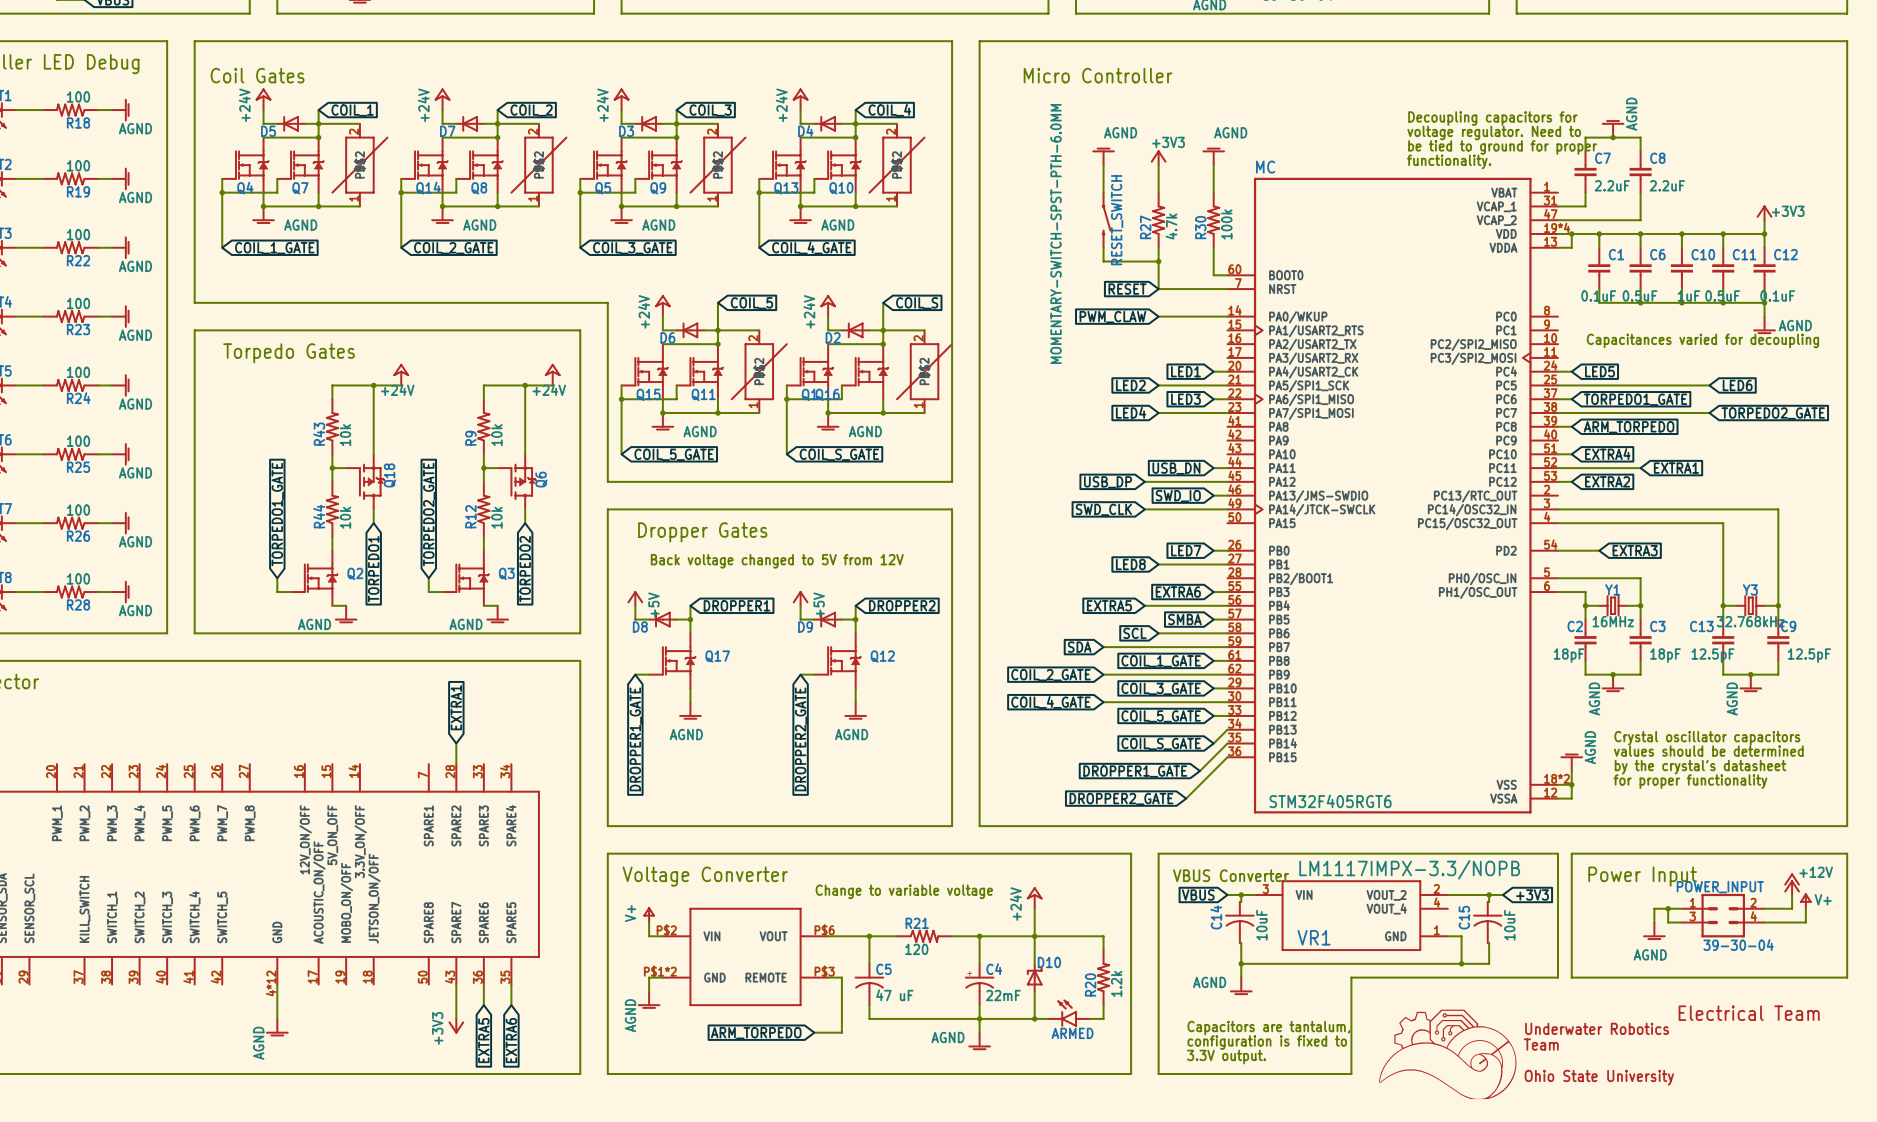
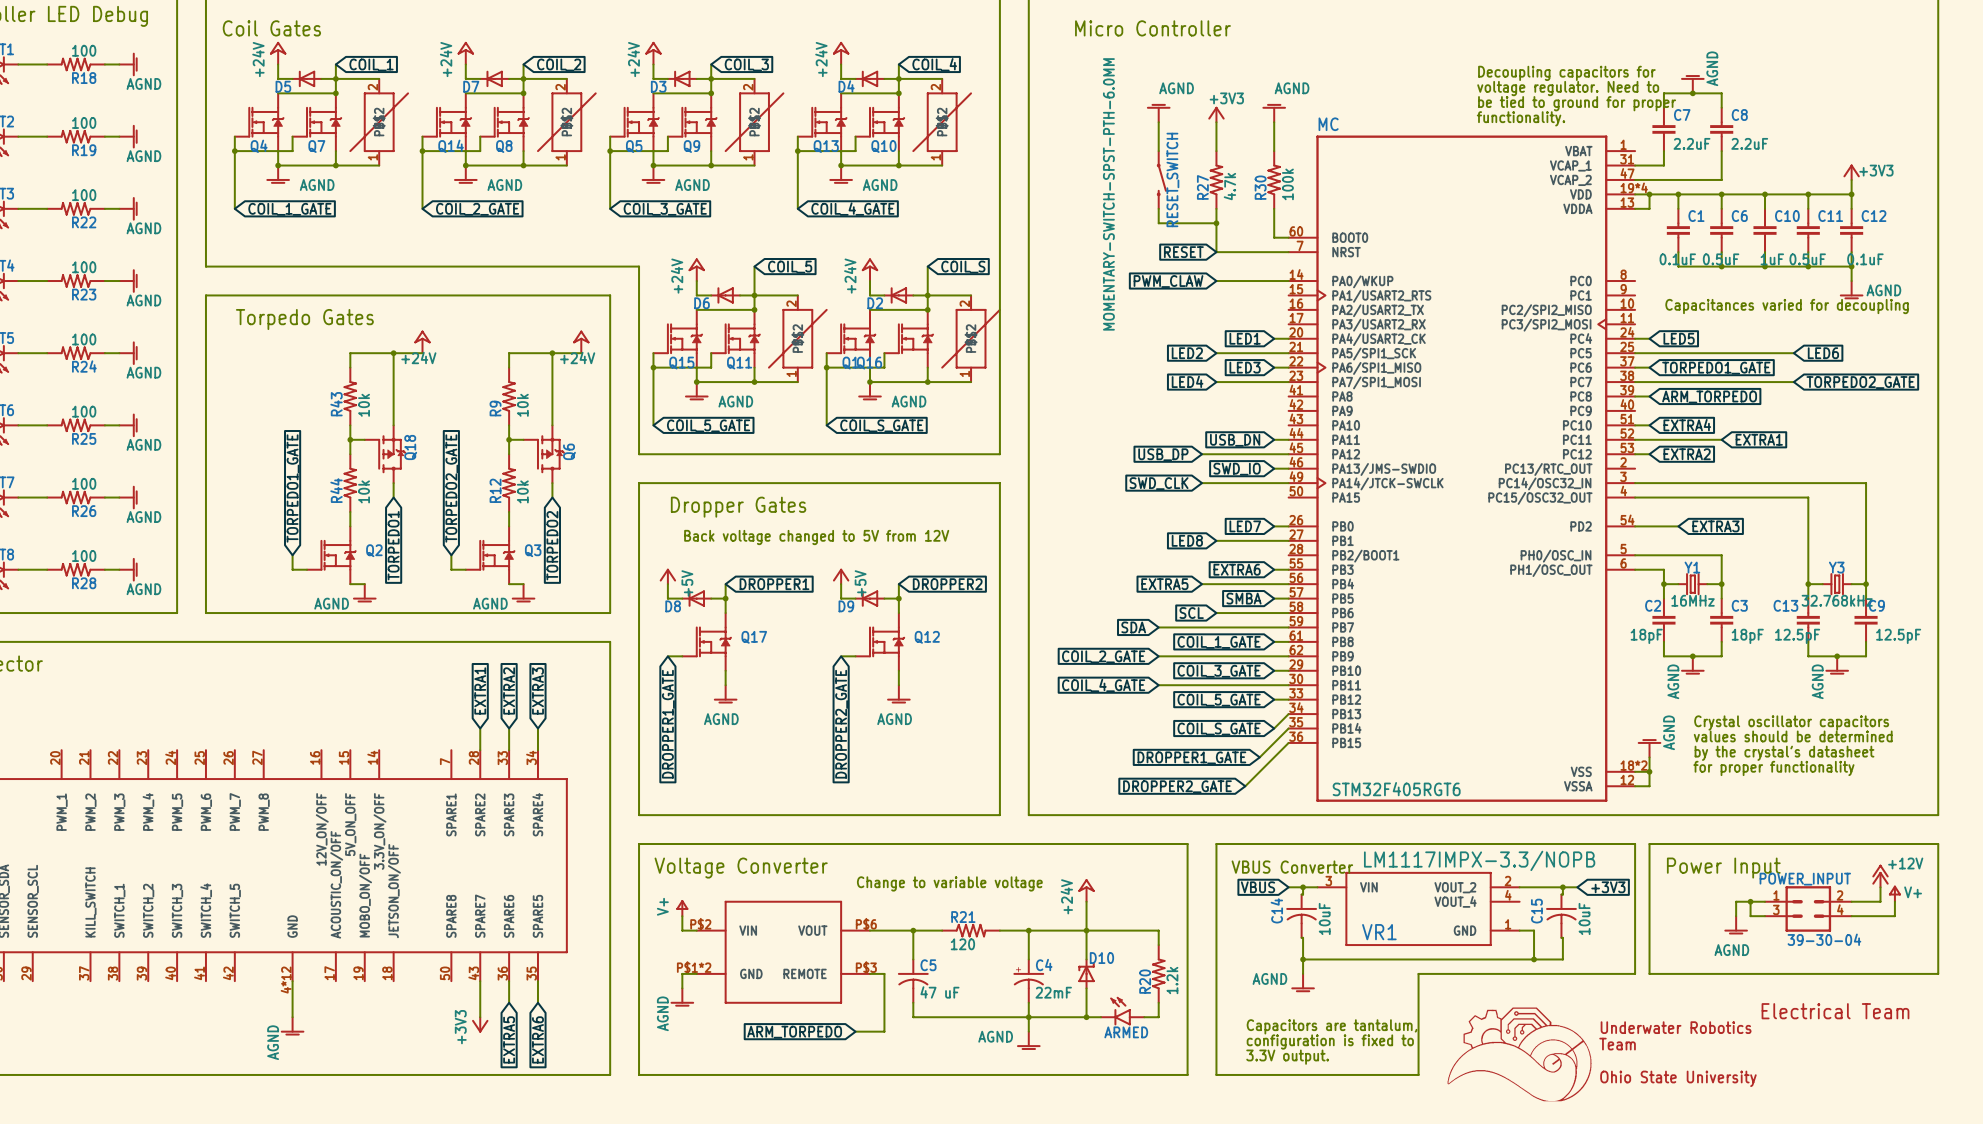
global label: none -> EXTRA2 (509, 690)
global label: none -> EXTRA3 (537, 690)
wire: none -> (509, 728) (509, 750)
wire: none -> (537, 728) (537, 750)

